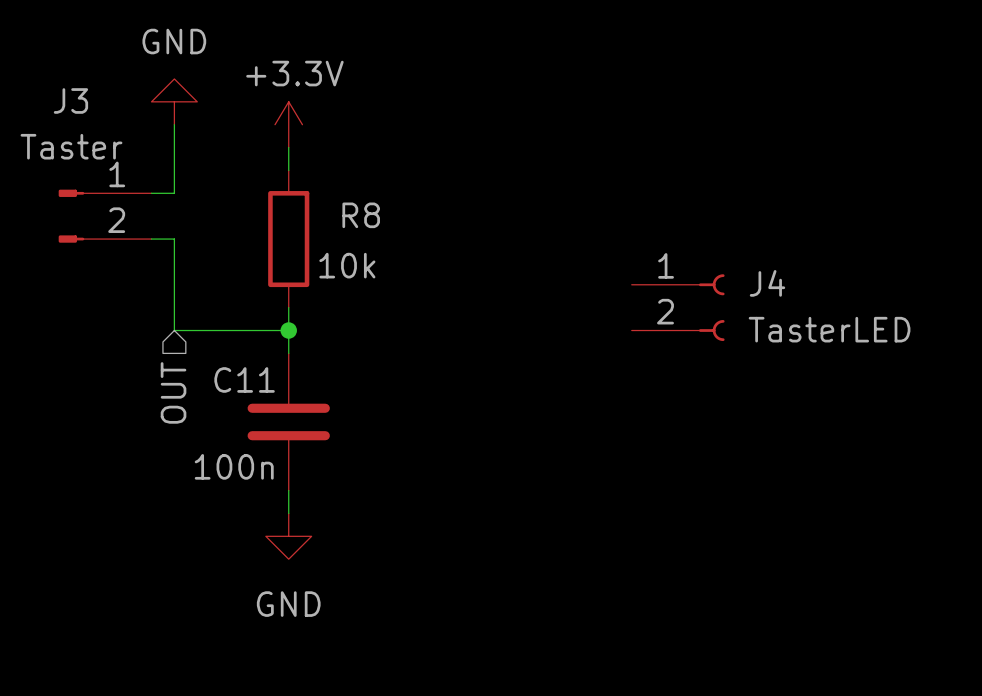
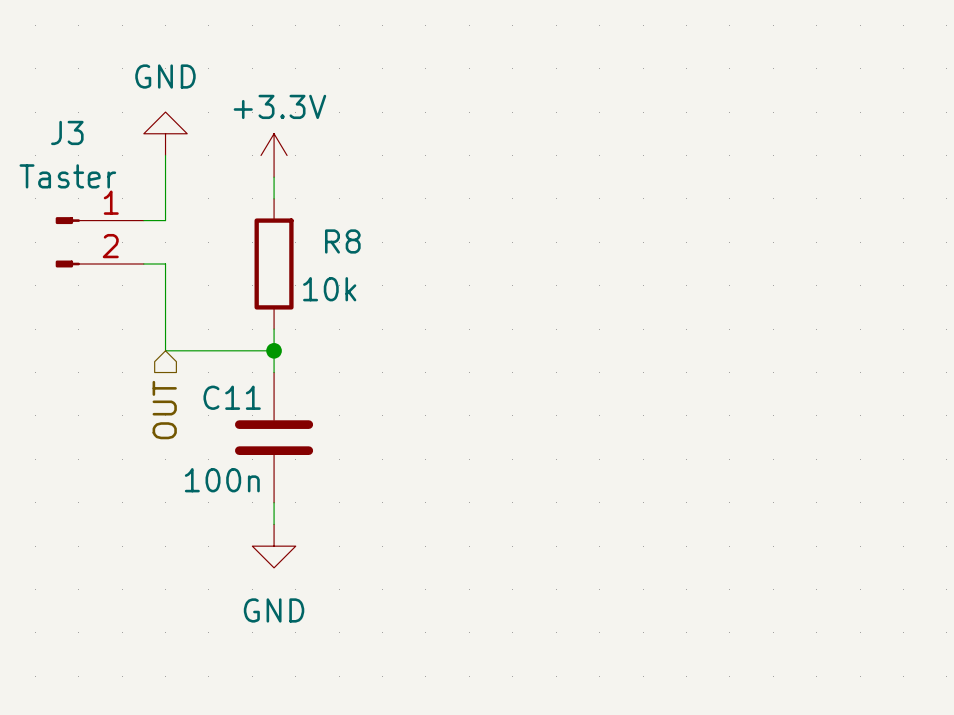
J4: TasterLED (678, 307) -> none

